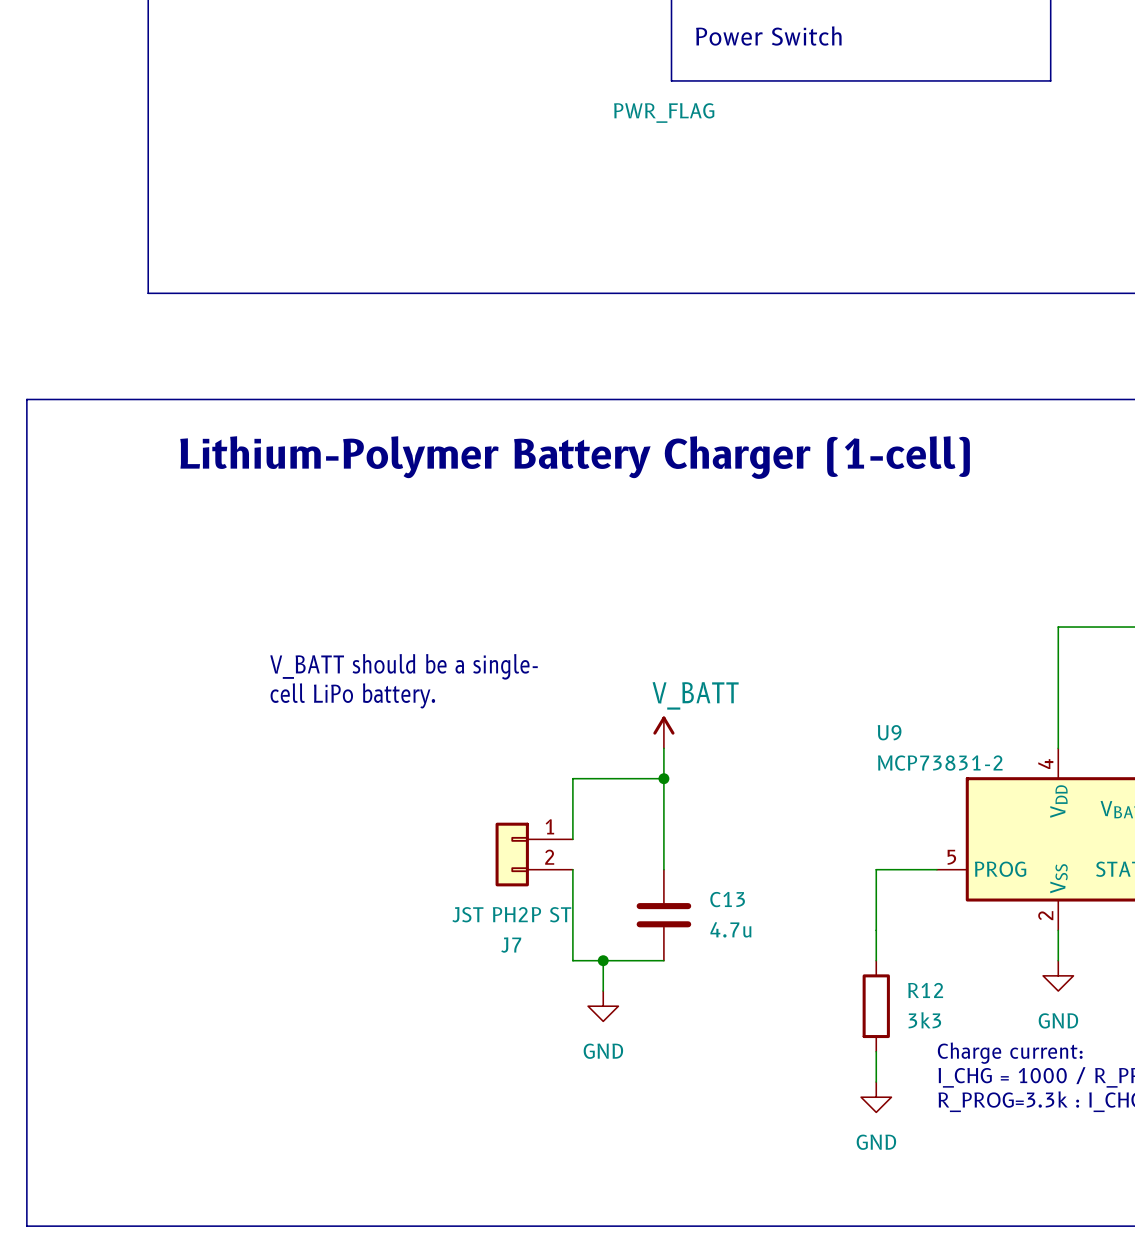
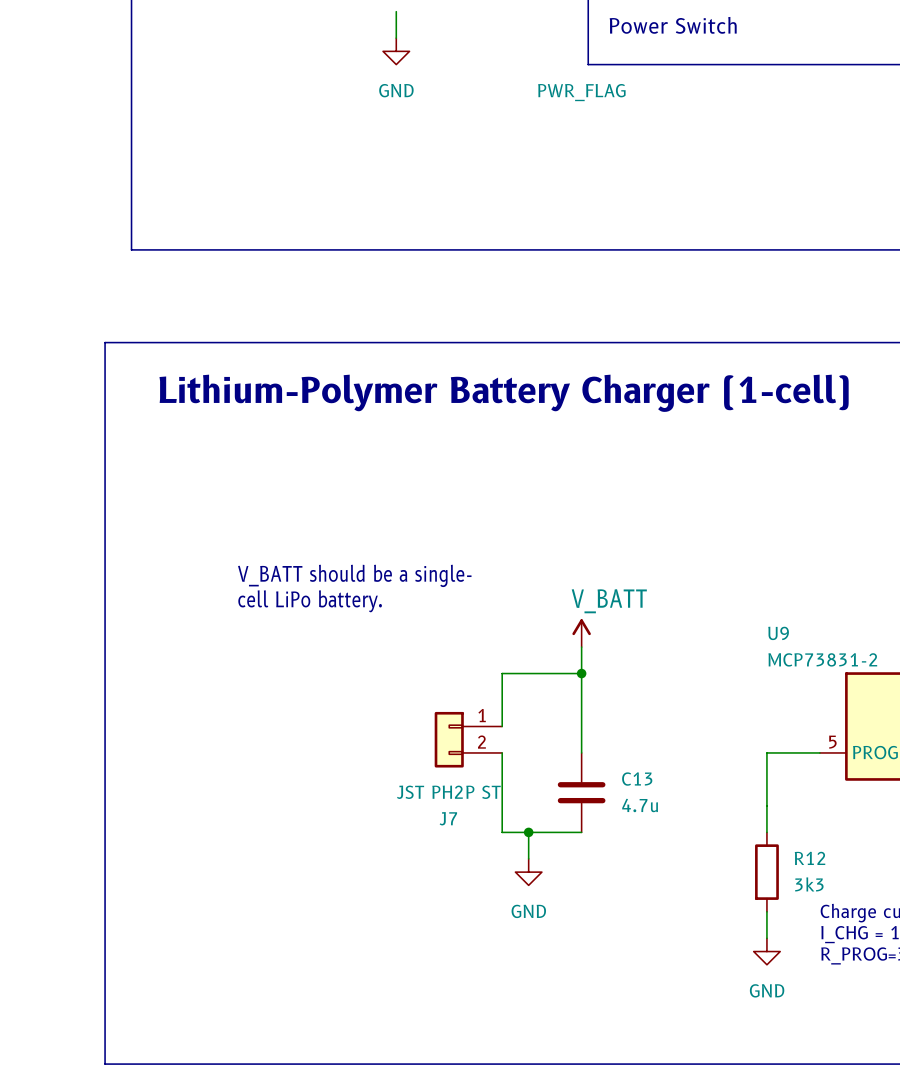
wire: none -> (396, 11) (396, 38)
power symbol: none -> GND (396, 51)
line: (117, 399) (26, 399) (26, 1226) (117, 1226) -> (105, 342) (105, 1064)

